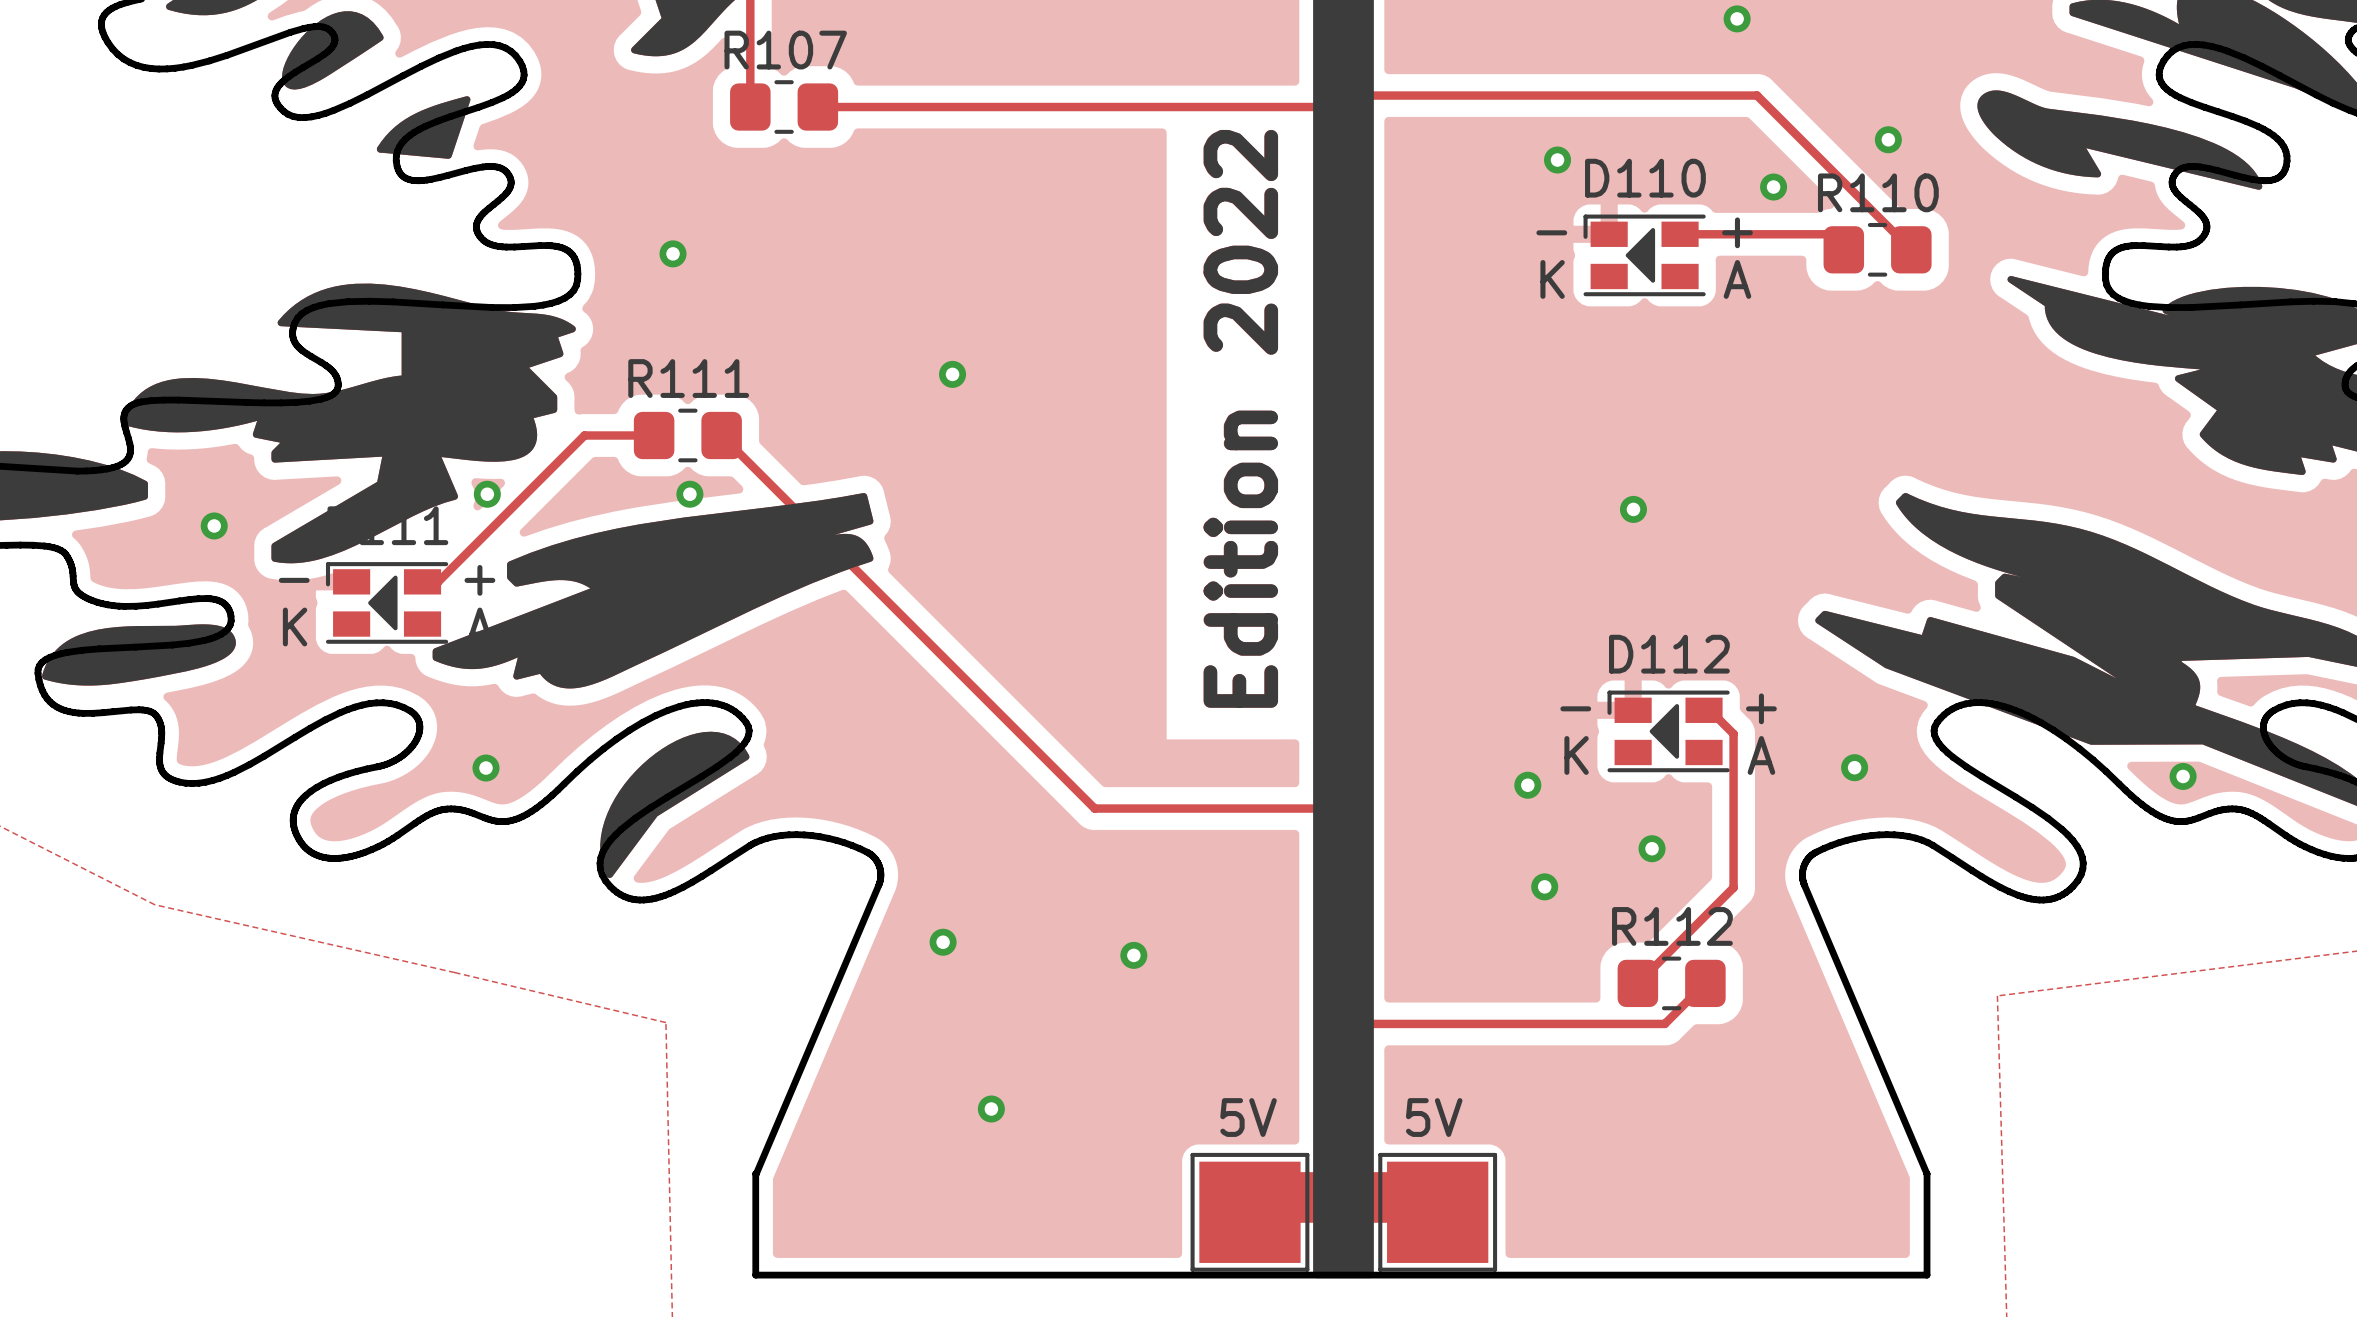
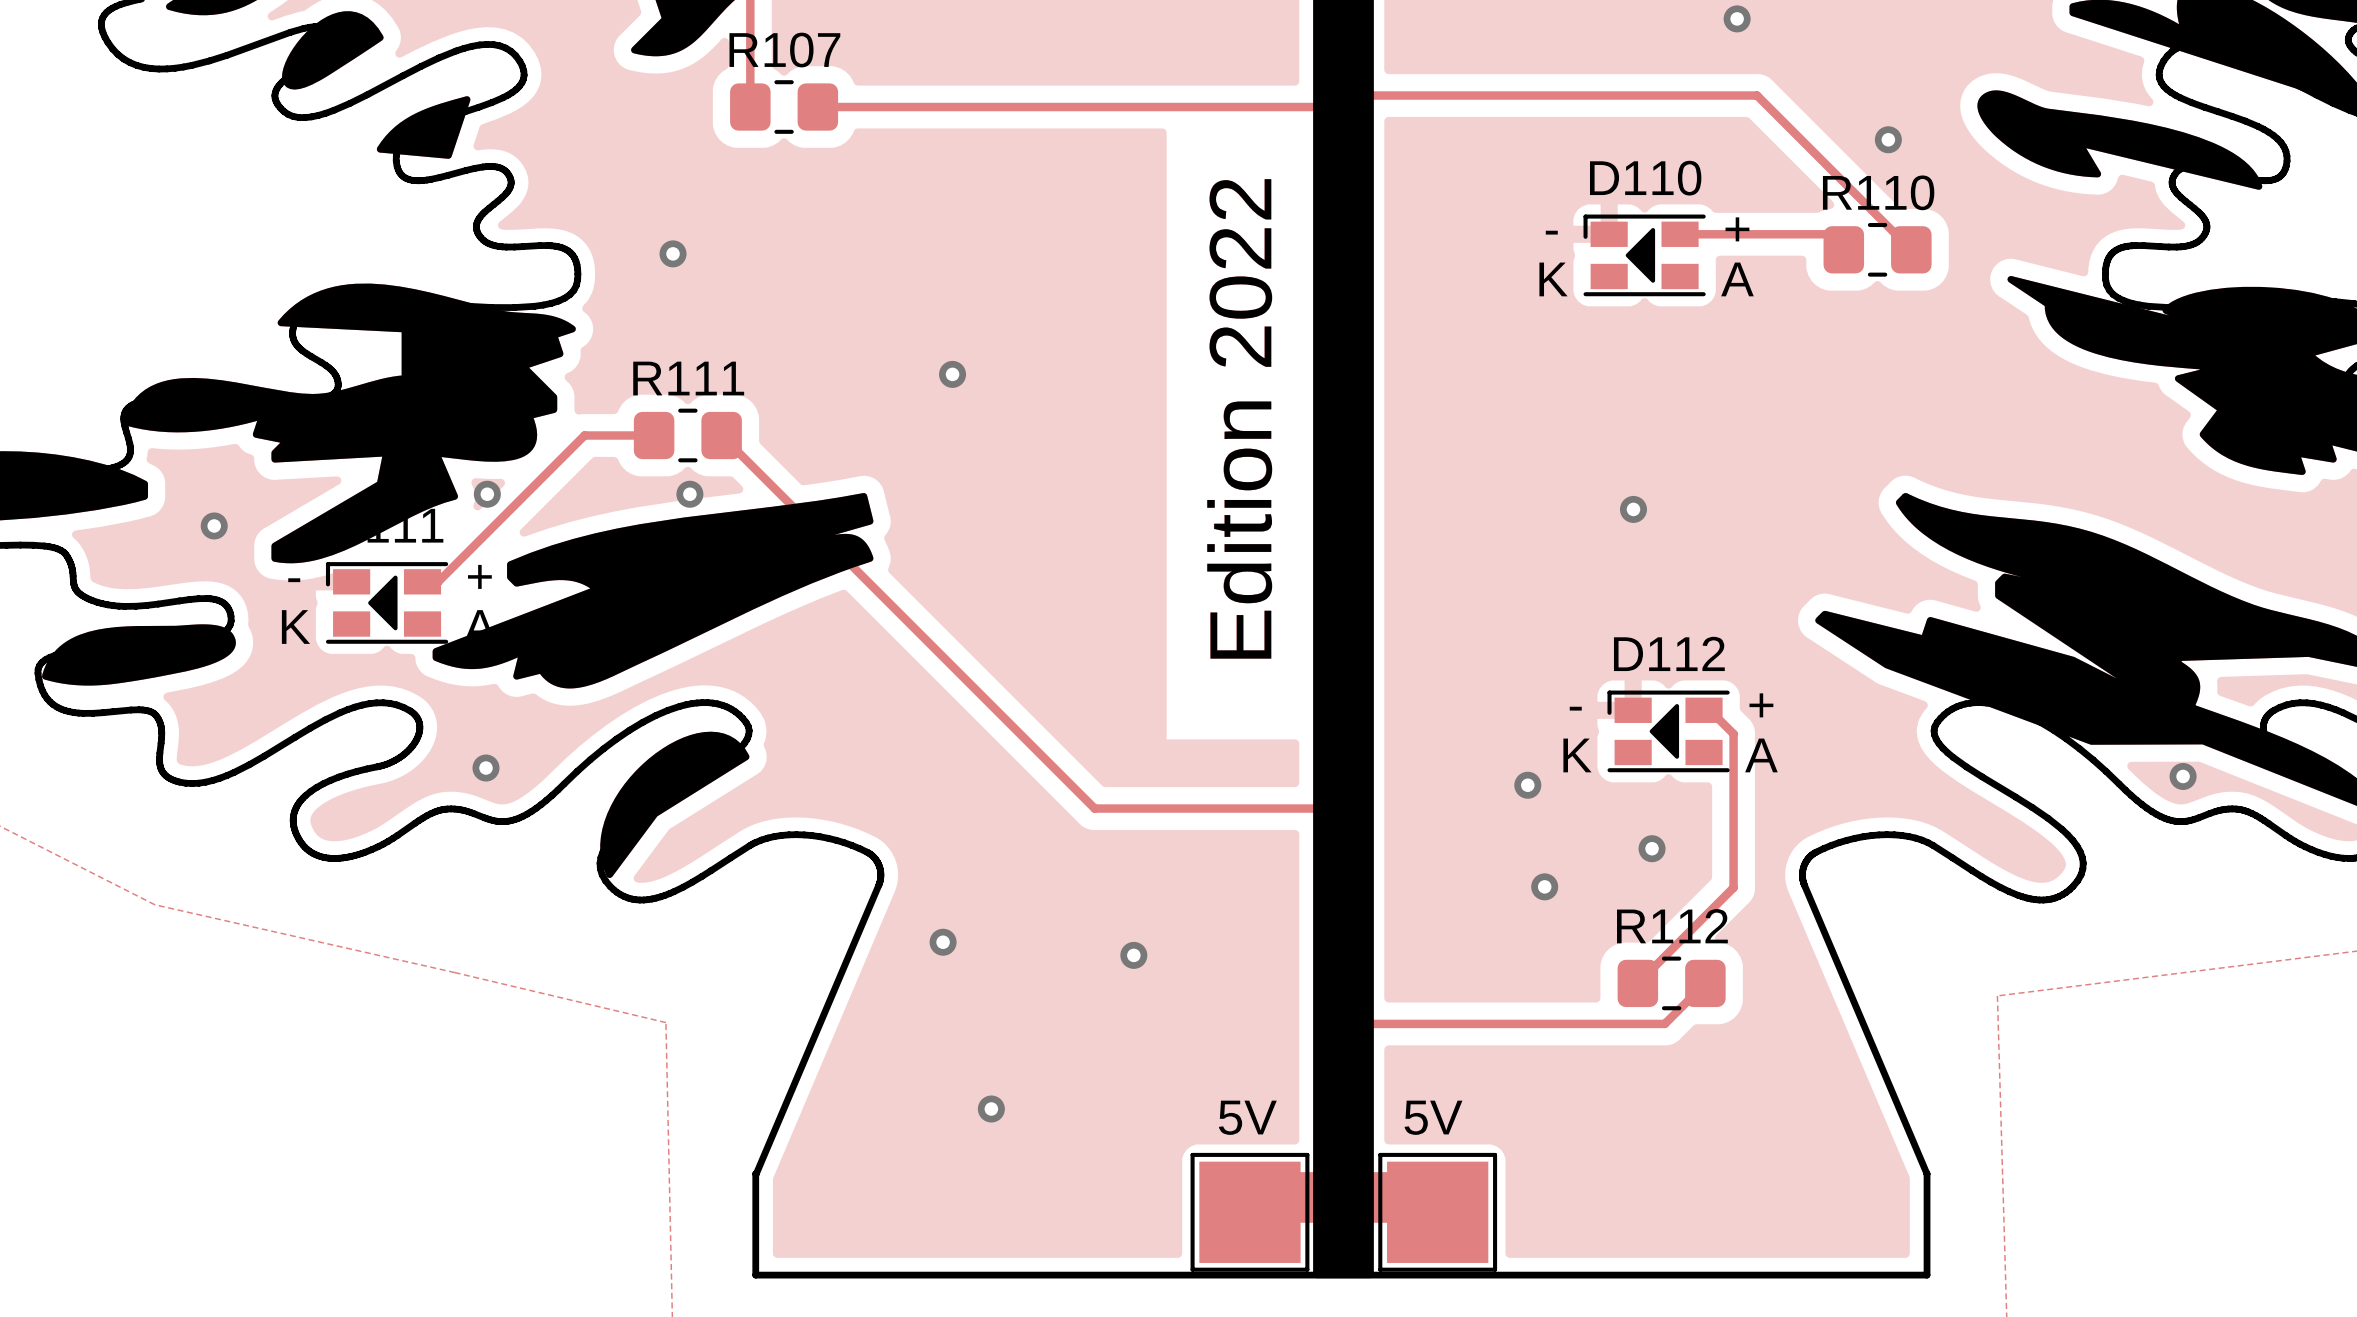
via: (1557, 160) -> none
via: (1773, 187) -> none
via: (1854, 767) -> none

